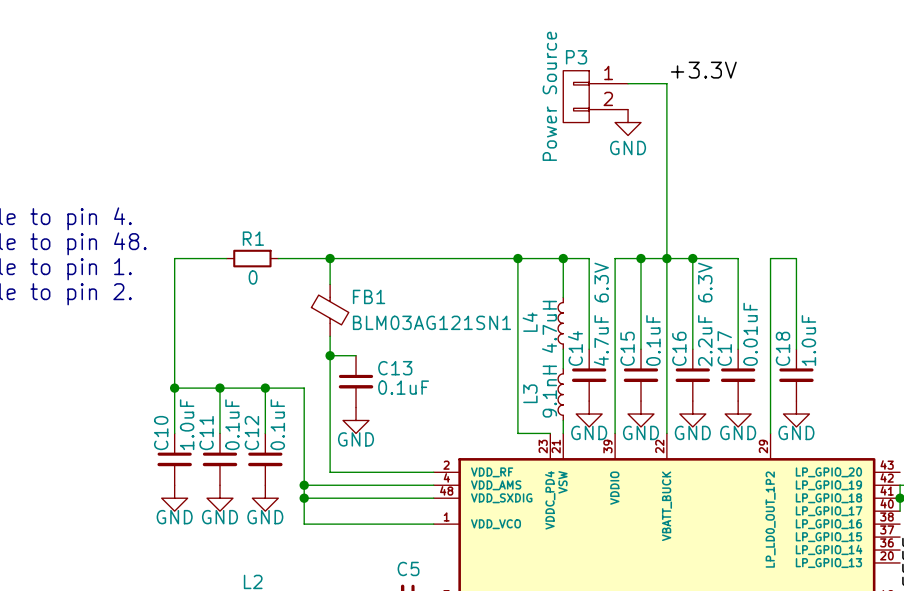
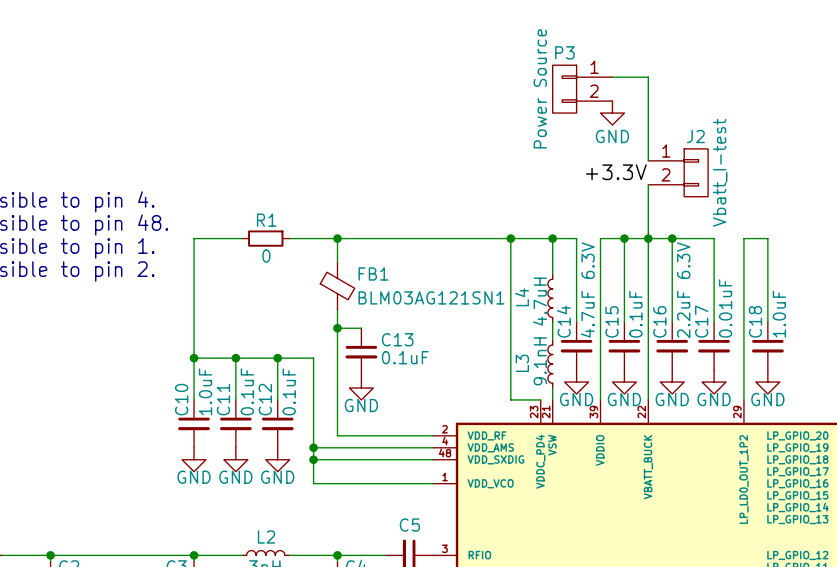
label position: +3.3V (703, 70) -> +3.3V (616, 172)
wire: (666, 174) (666, 200) -> none
J2: none -> Vbatt_I-test (678, 172)

